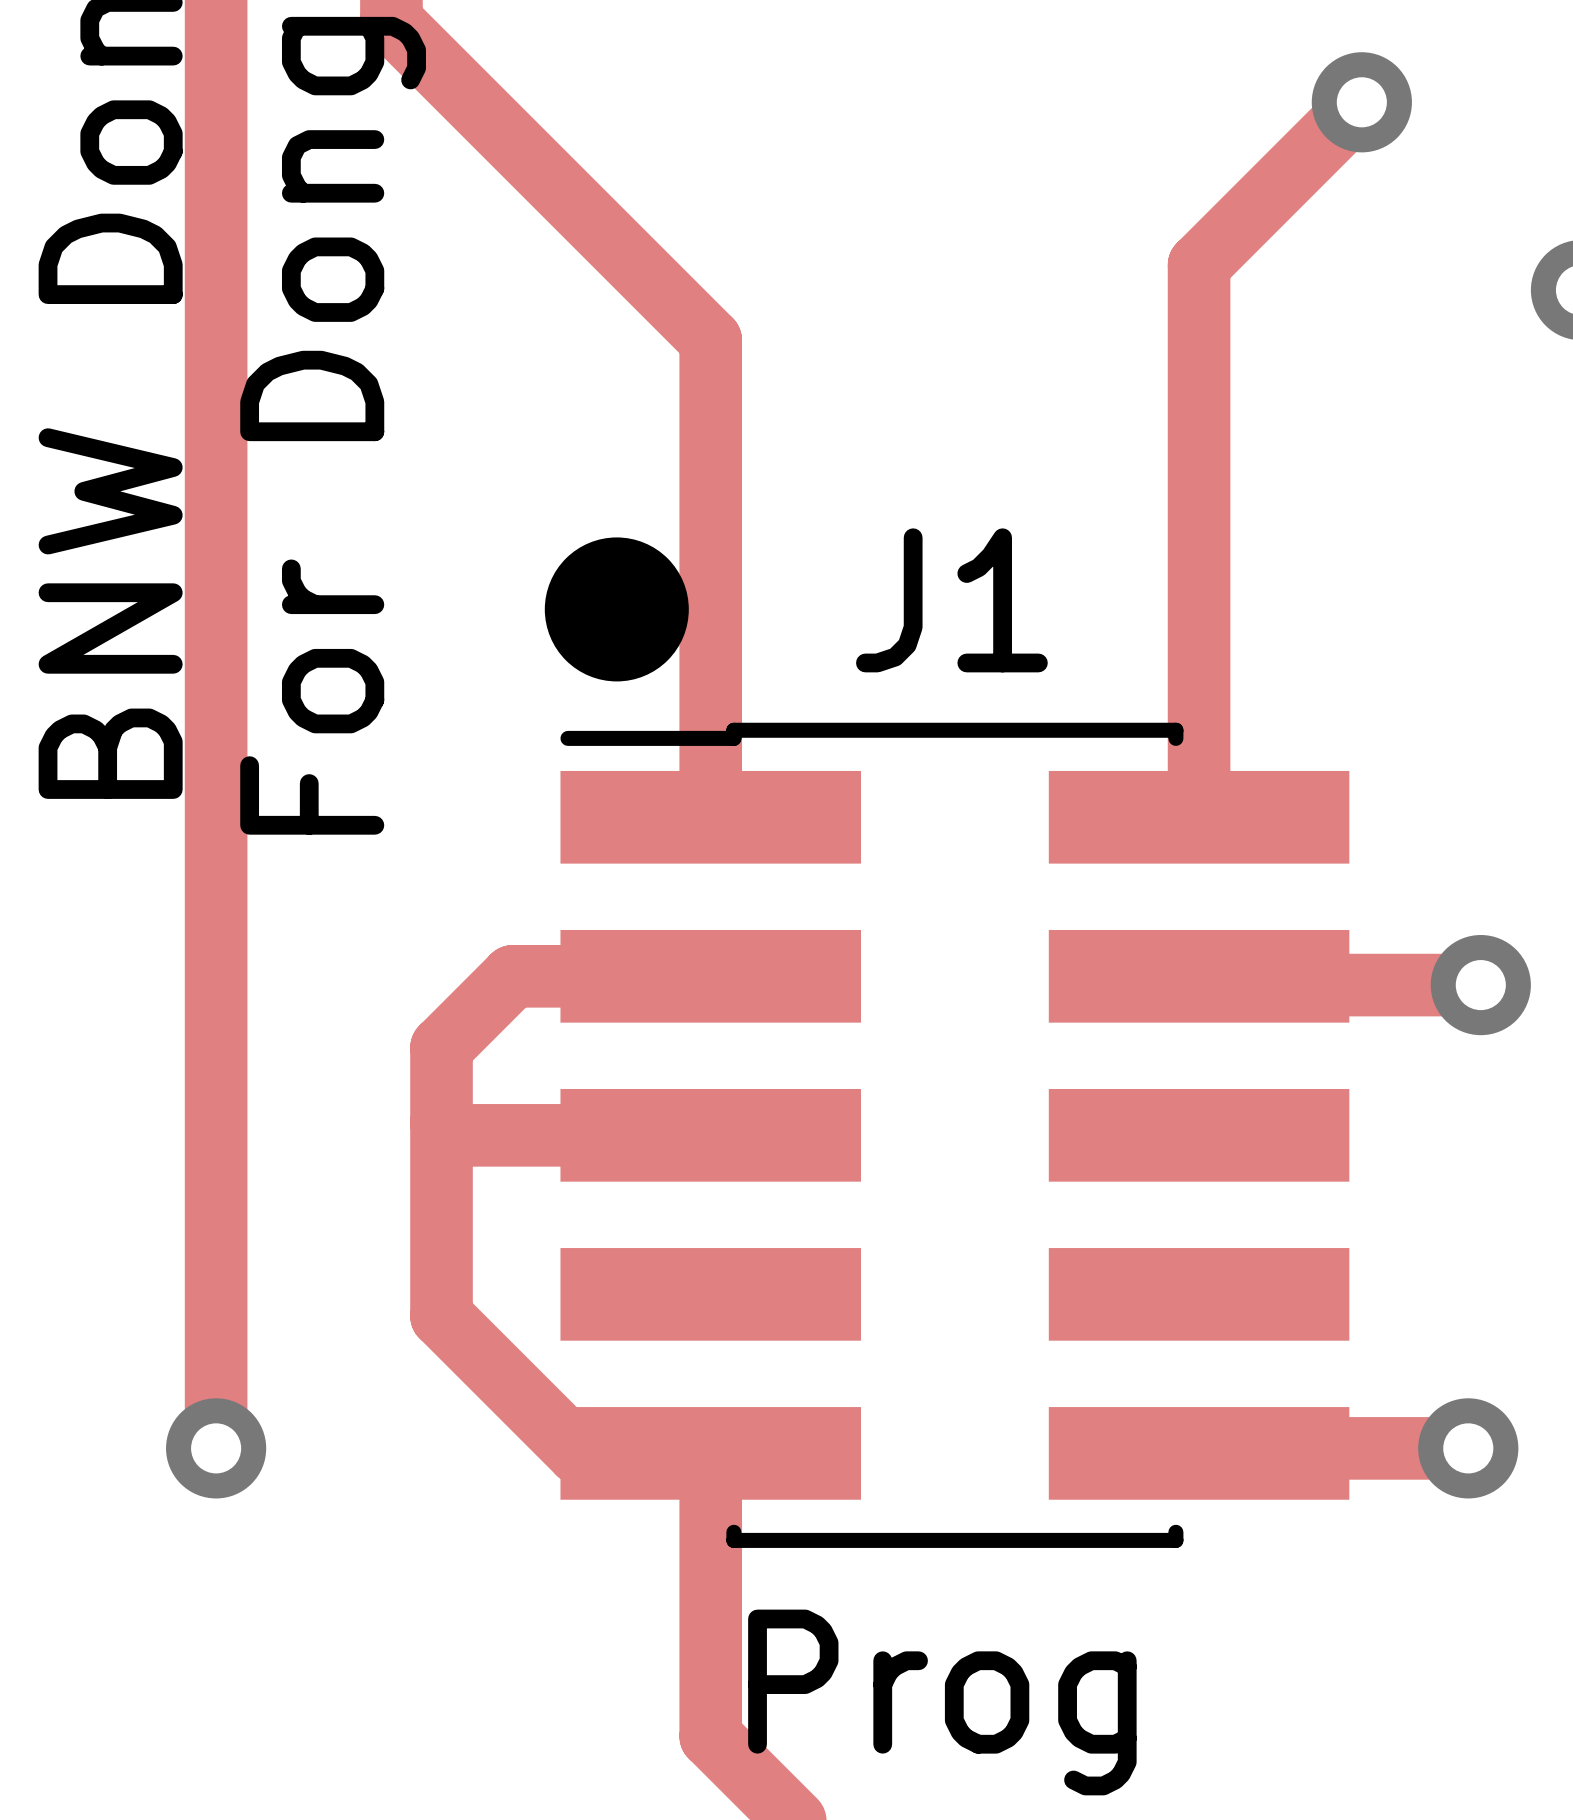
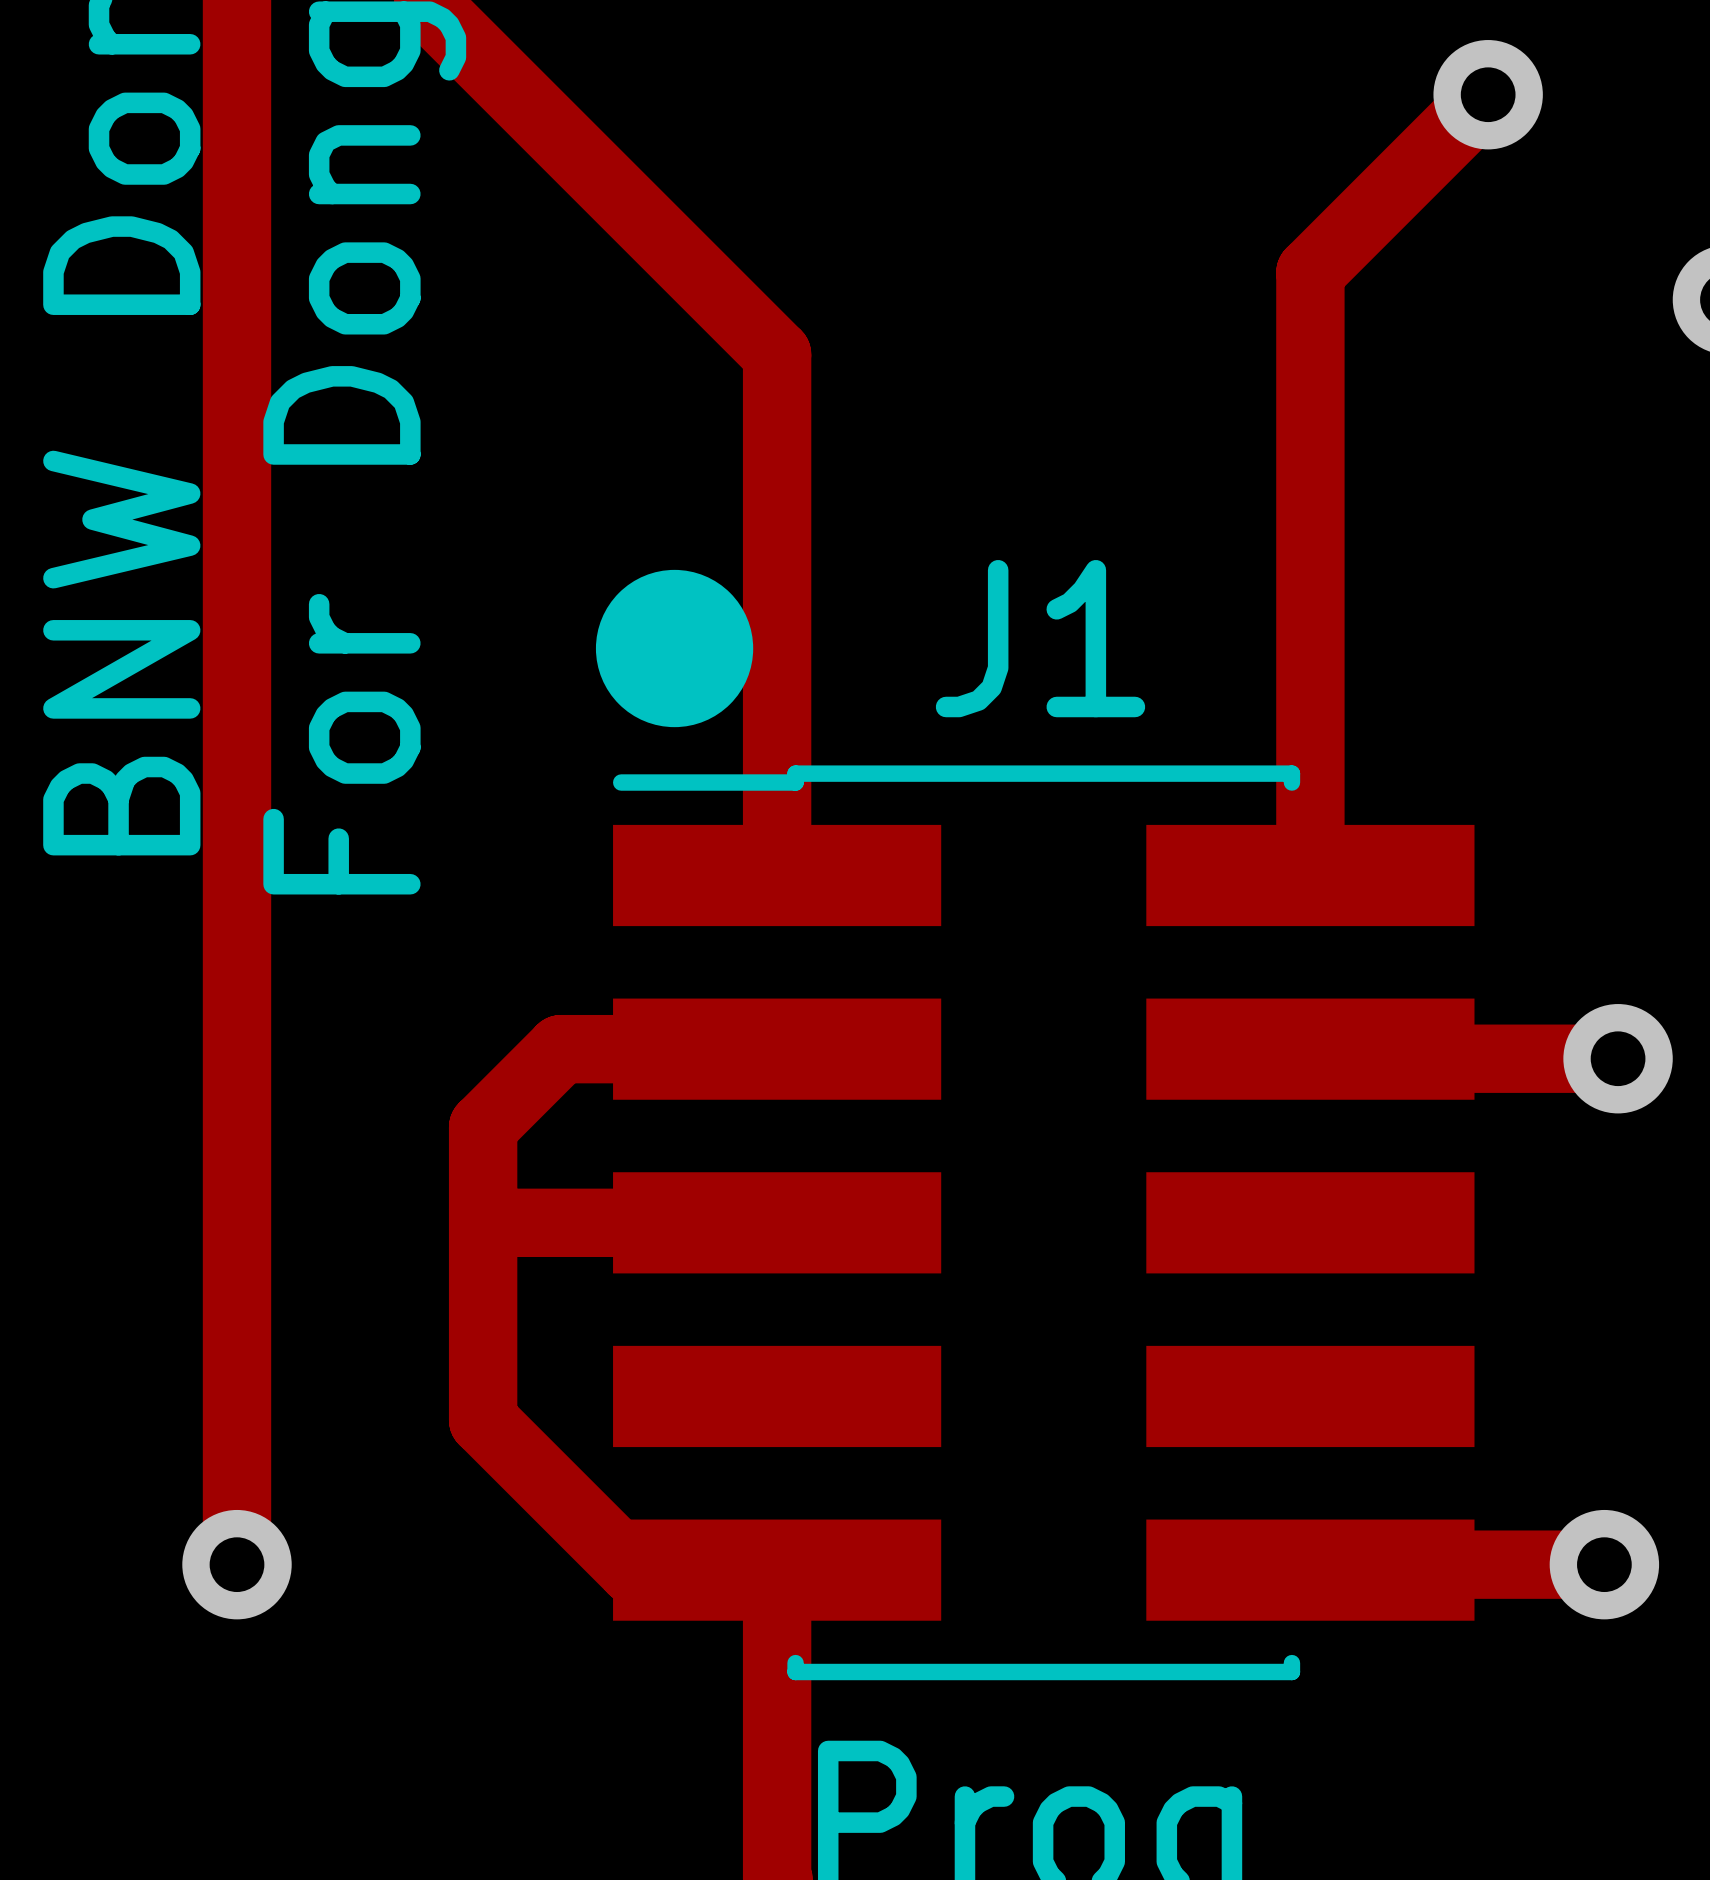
J1 footprint: [560, 722, 1350, 1548] -> [613, 765, 1475, 1681]

